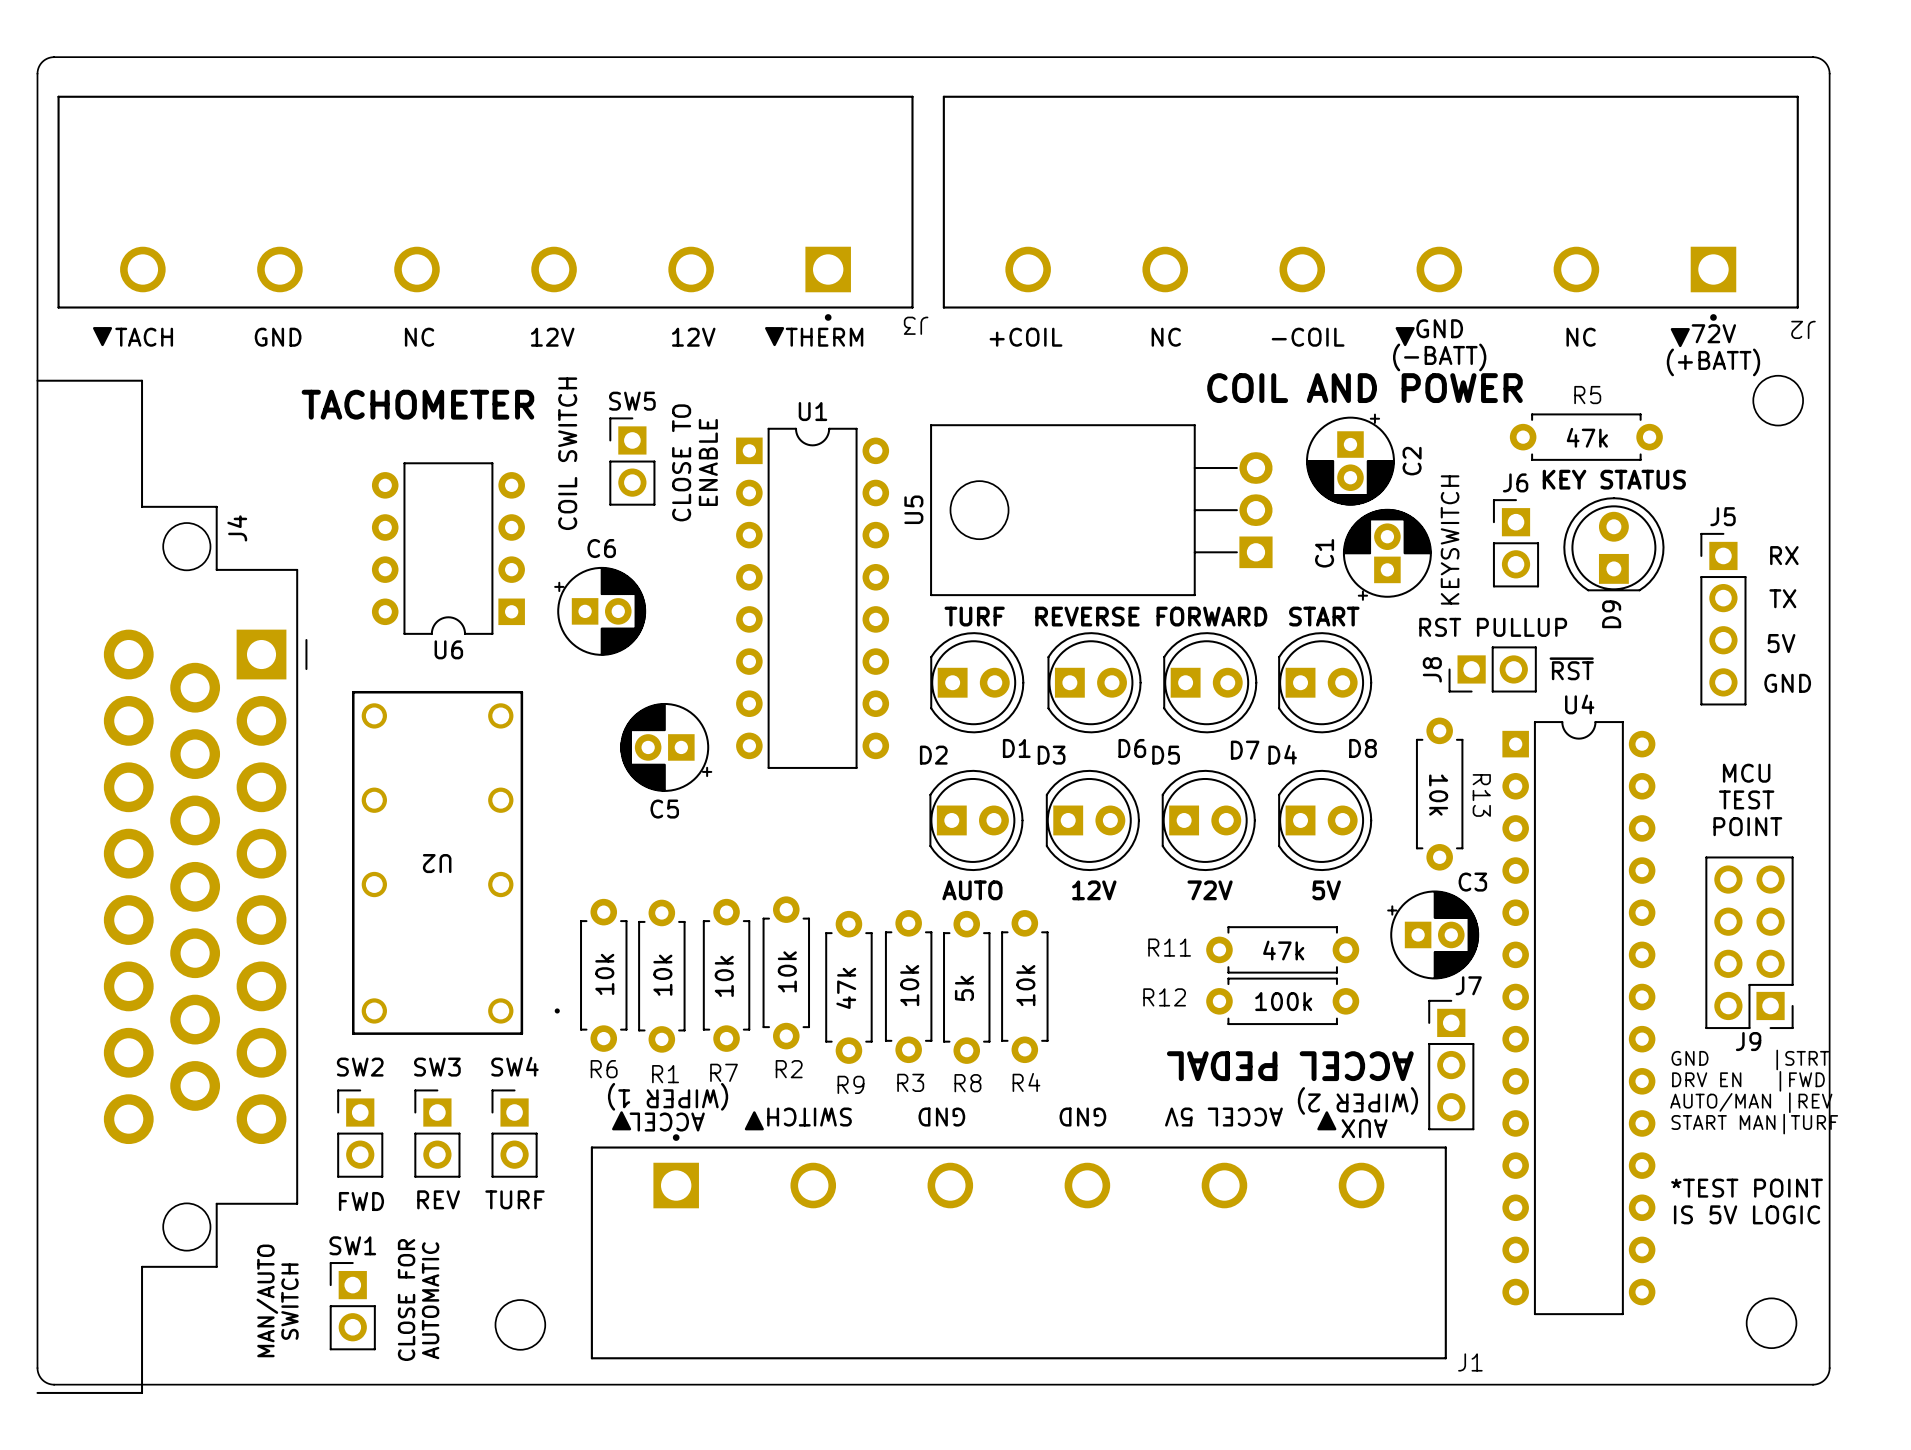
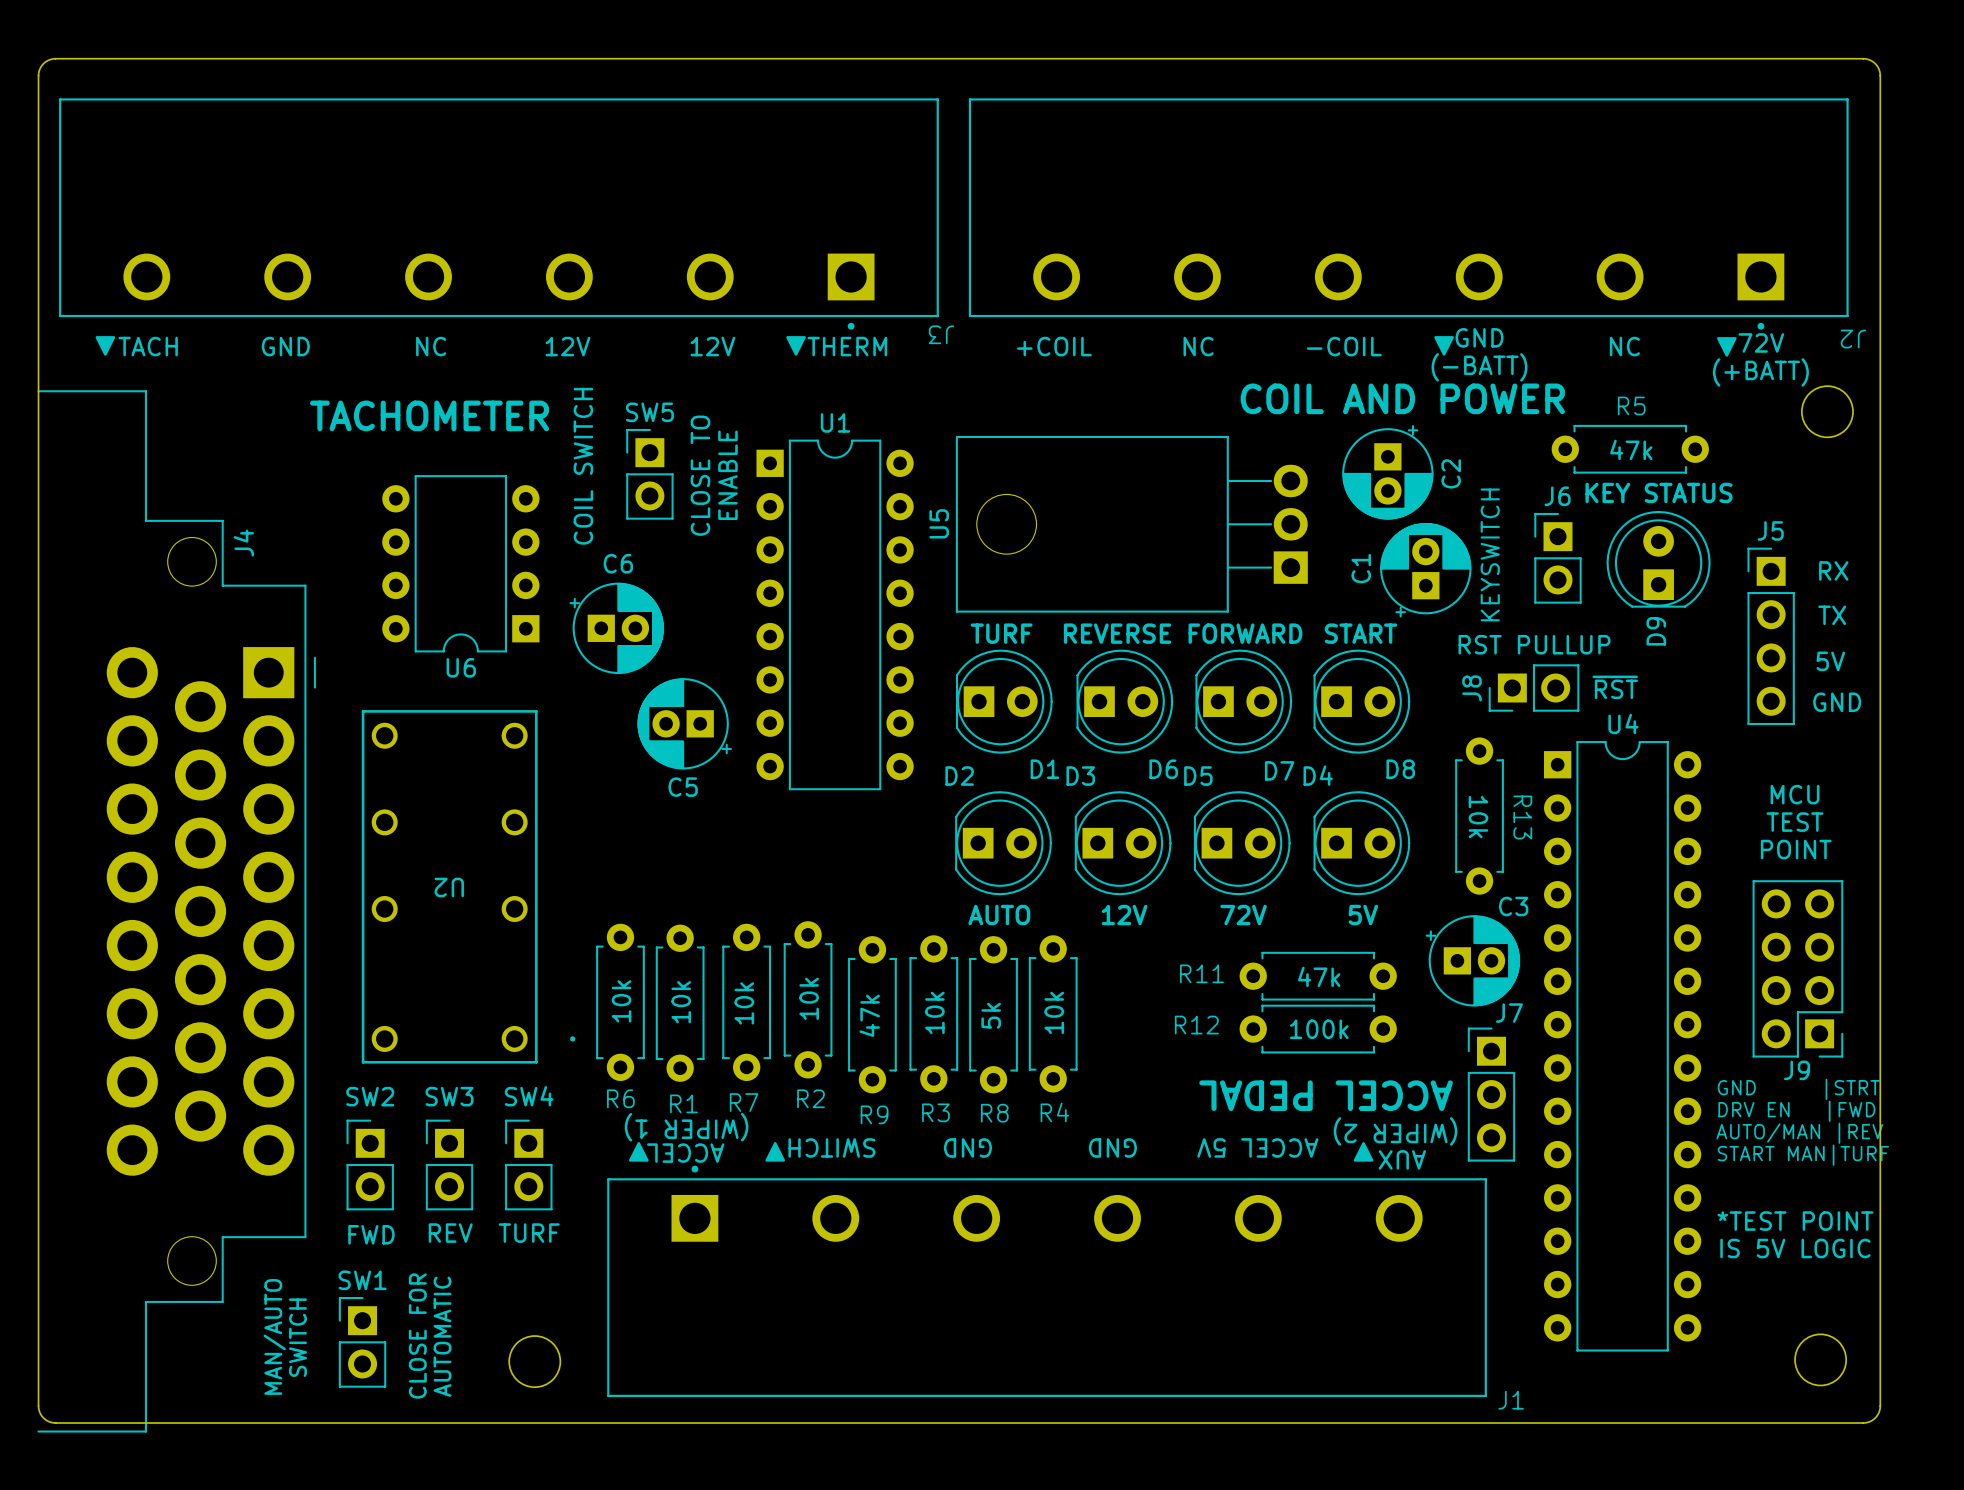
C5 position: (666, 747) -> (684, 723)

